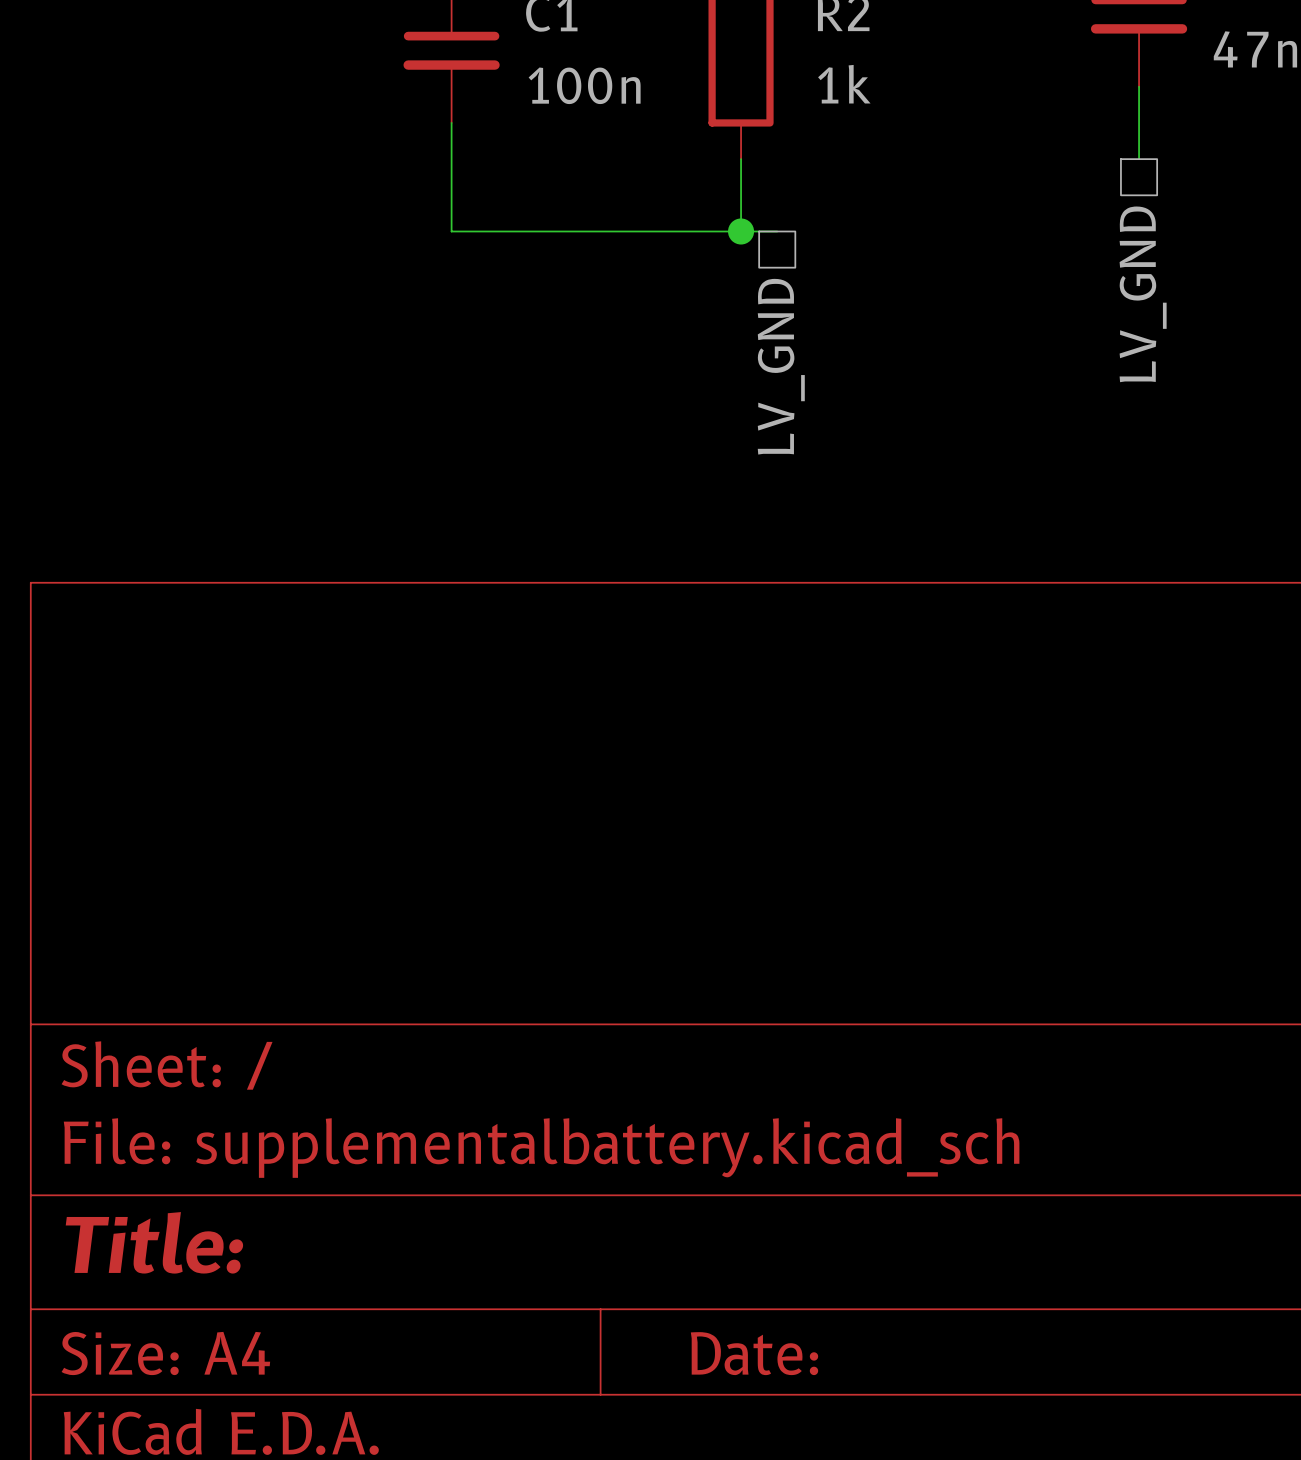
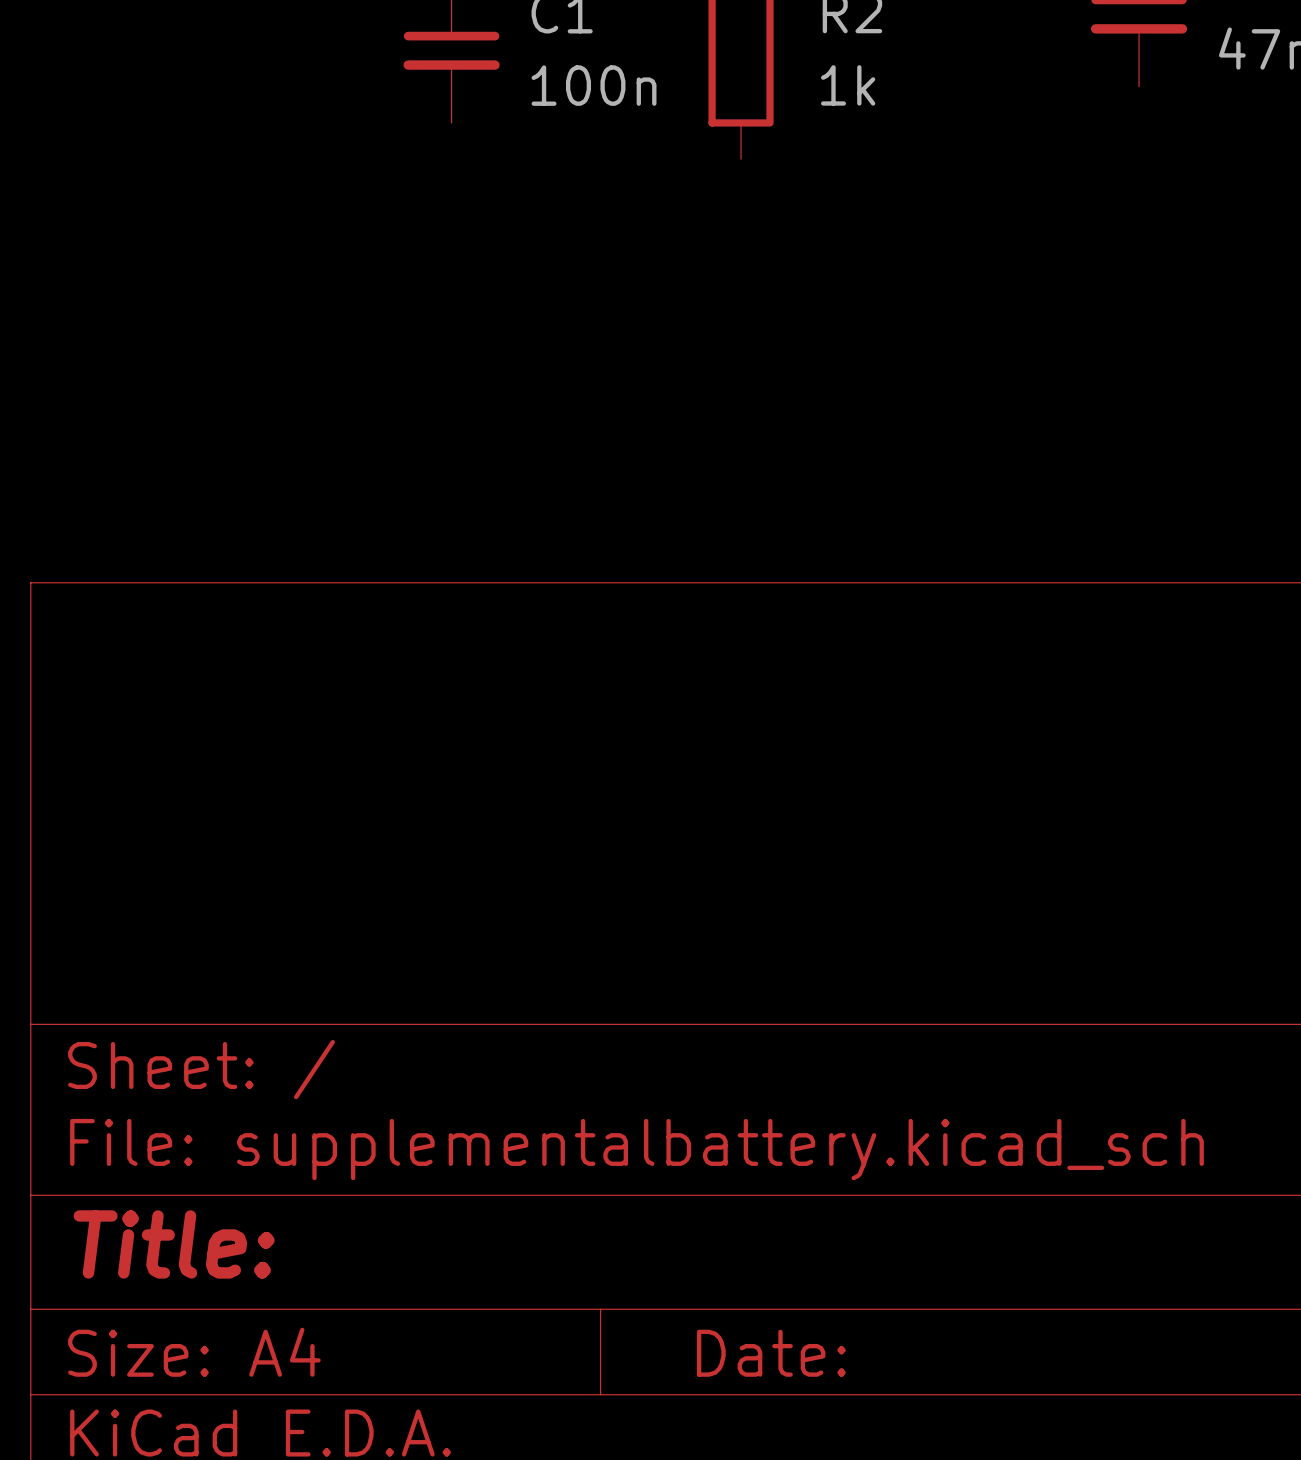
wire: (1139, 86) (1139, 159) -> none
wire: (451, 122) (451, 231) (777, 231) -> none
wire: (741, 159) (741, 231) -> none
junction: (741, 231) -> none
hierarchical label: LV_GND (1143, 294) -> none
hierarchical label: LV_GND (781, 366) -> none

